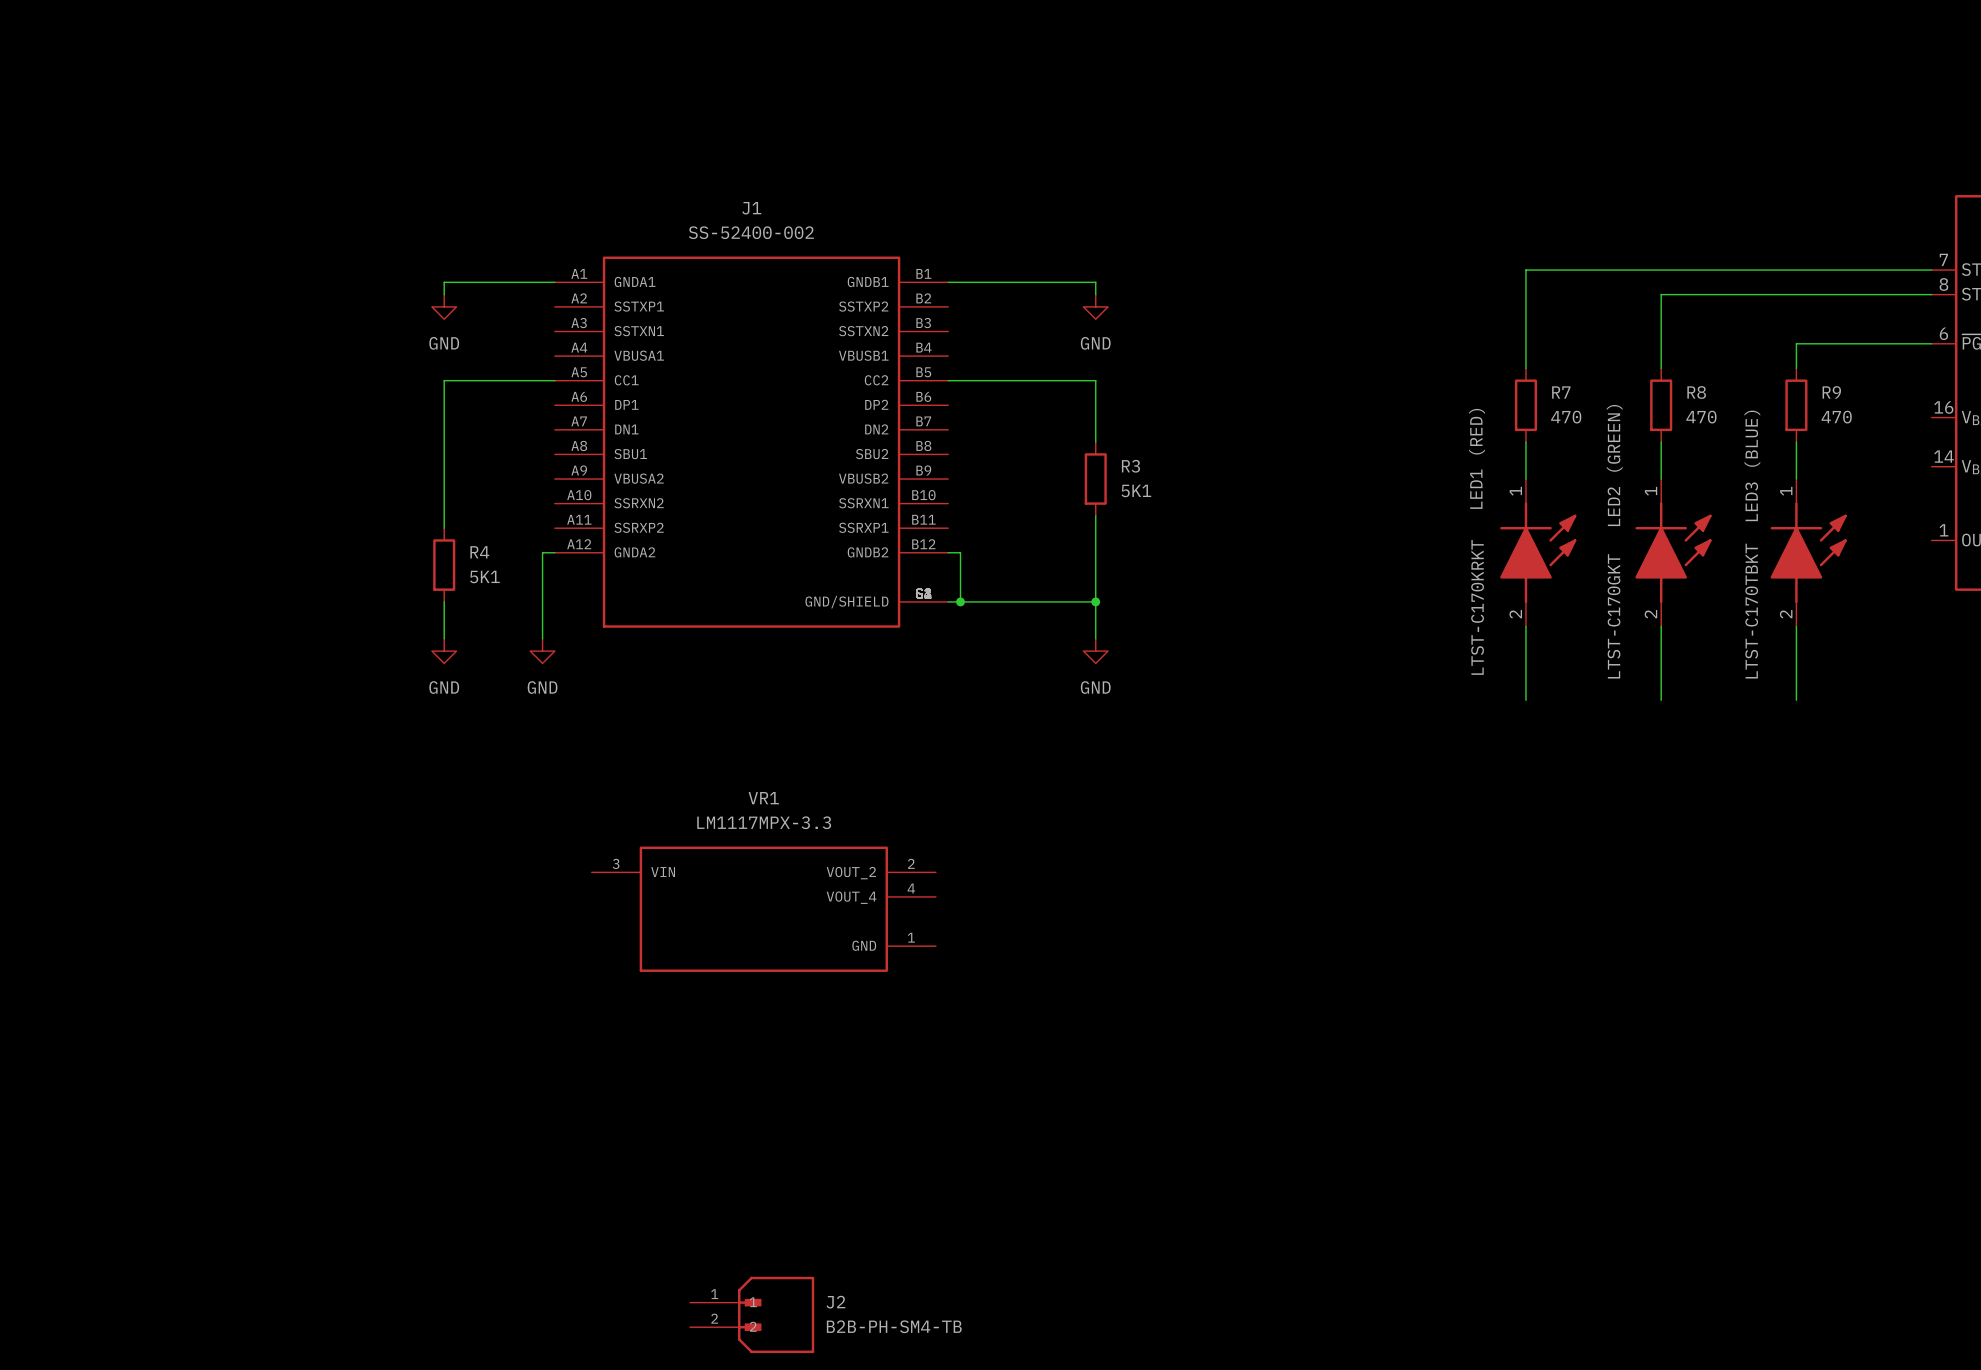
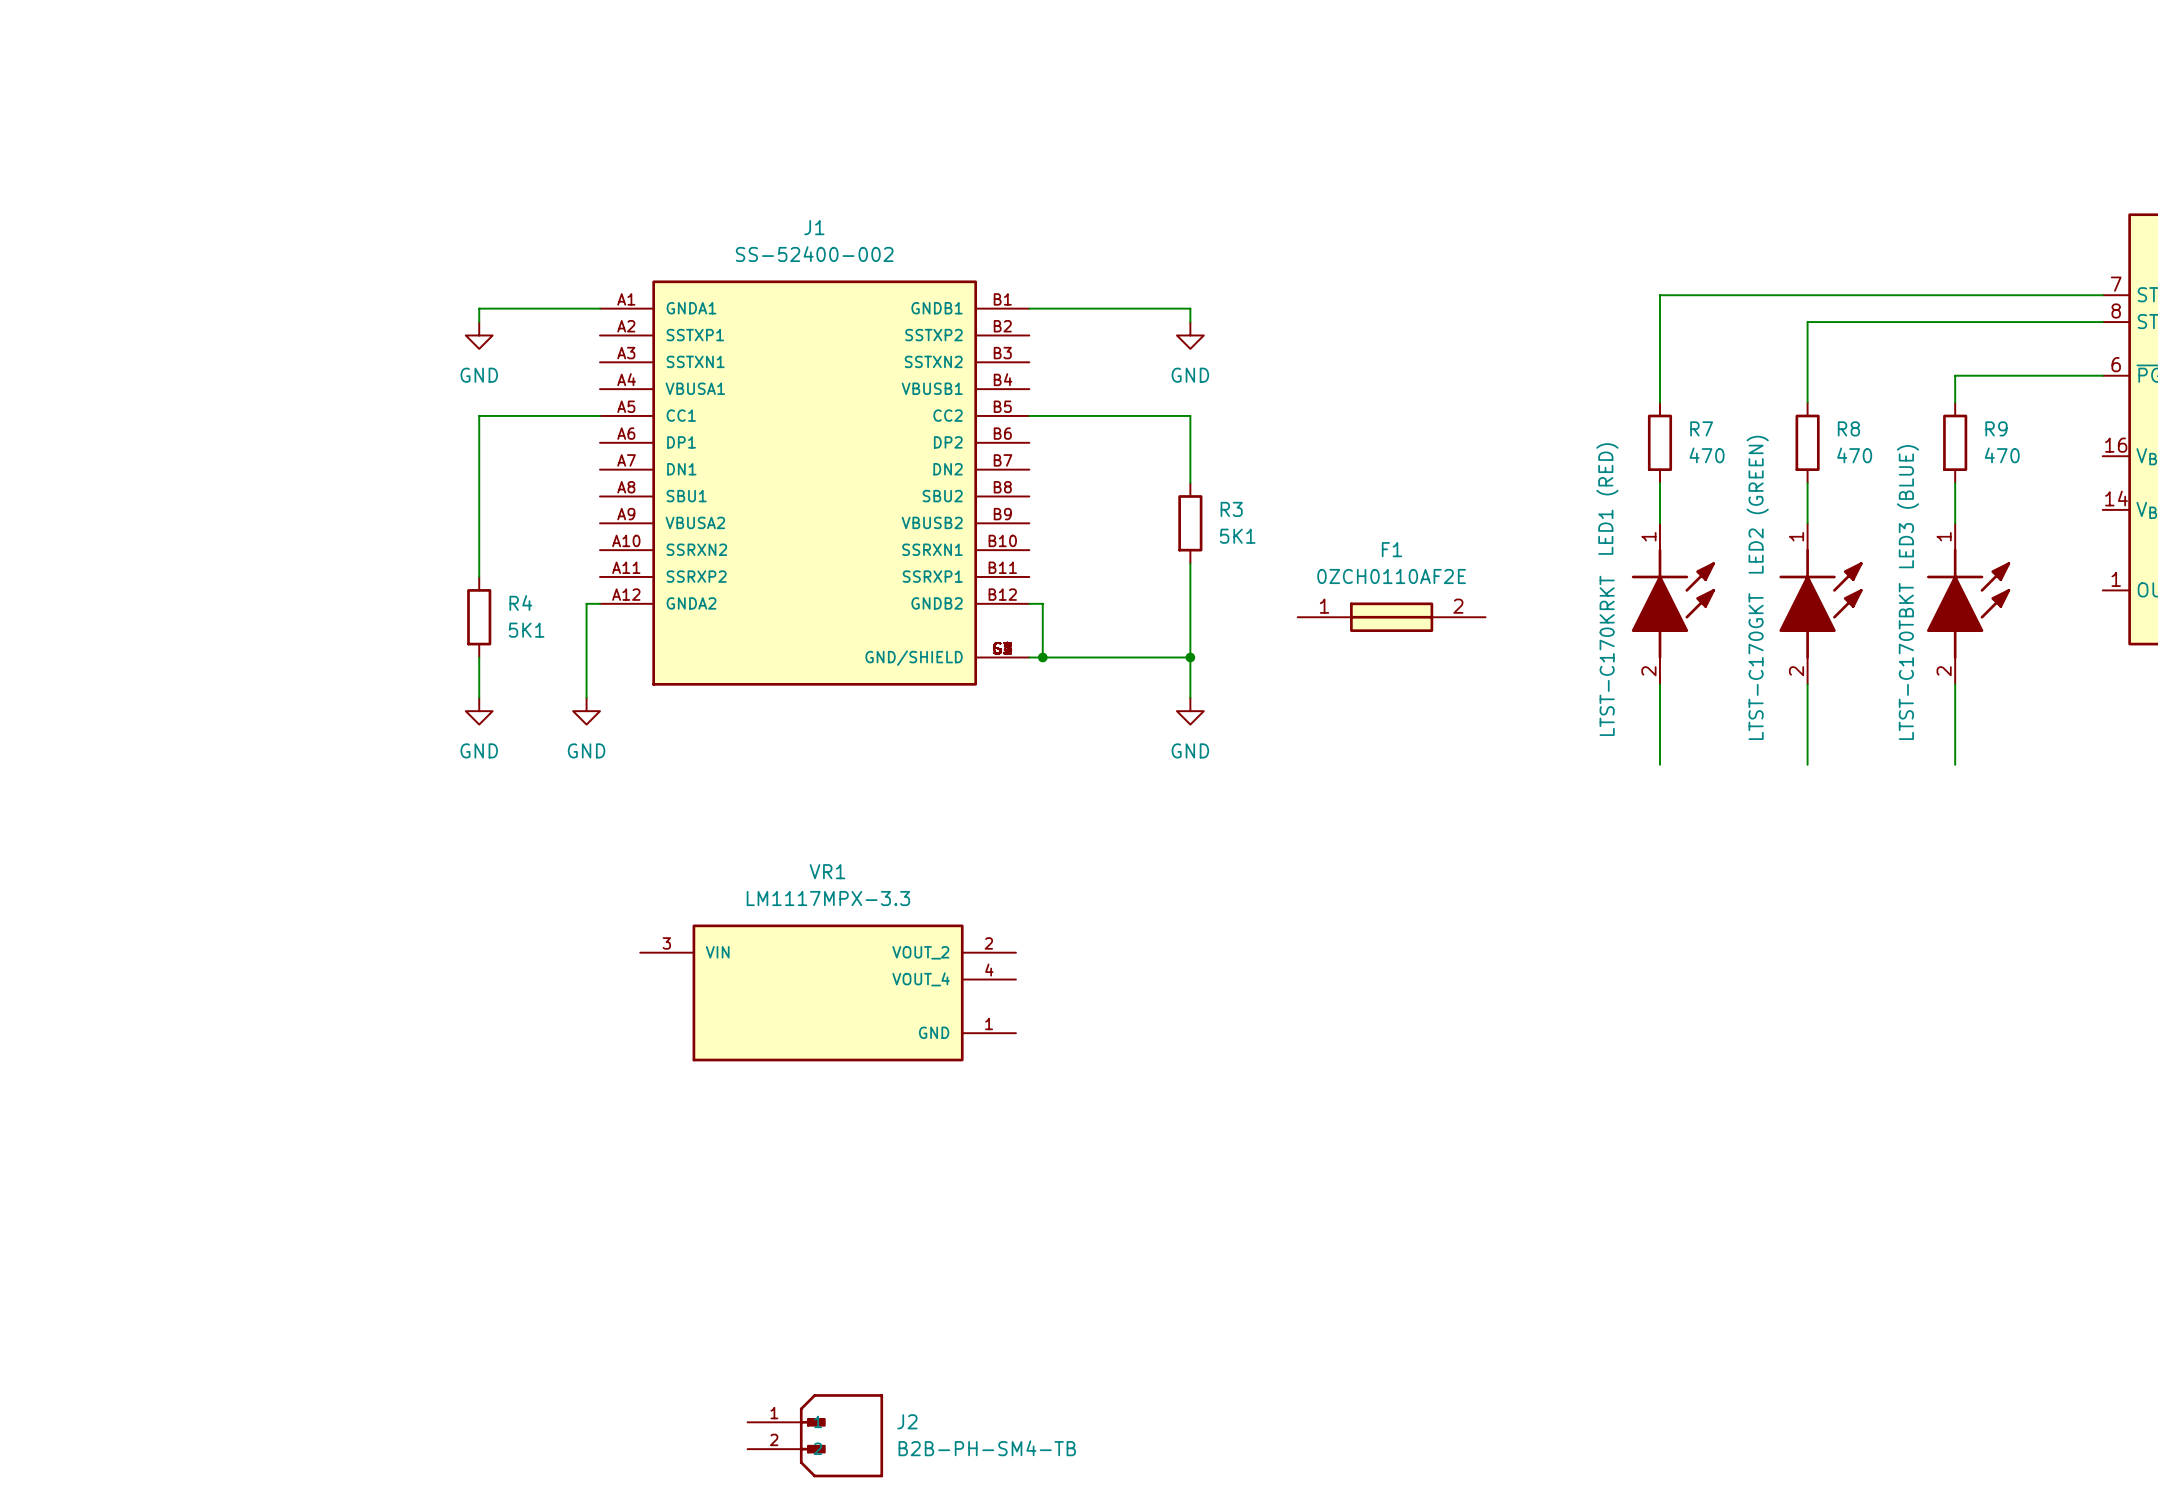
F1: none -> 0ZCH0110AF2E (1391, 617)

